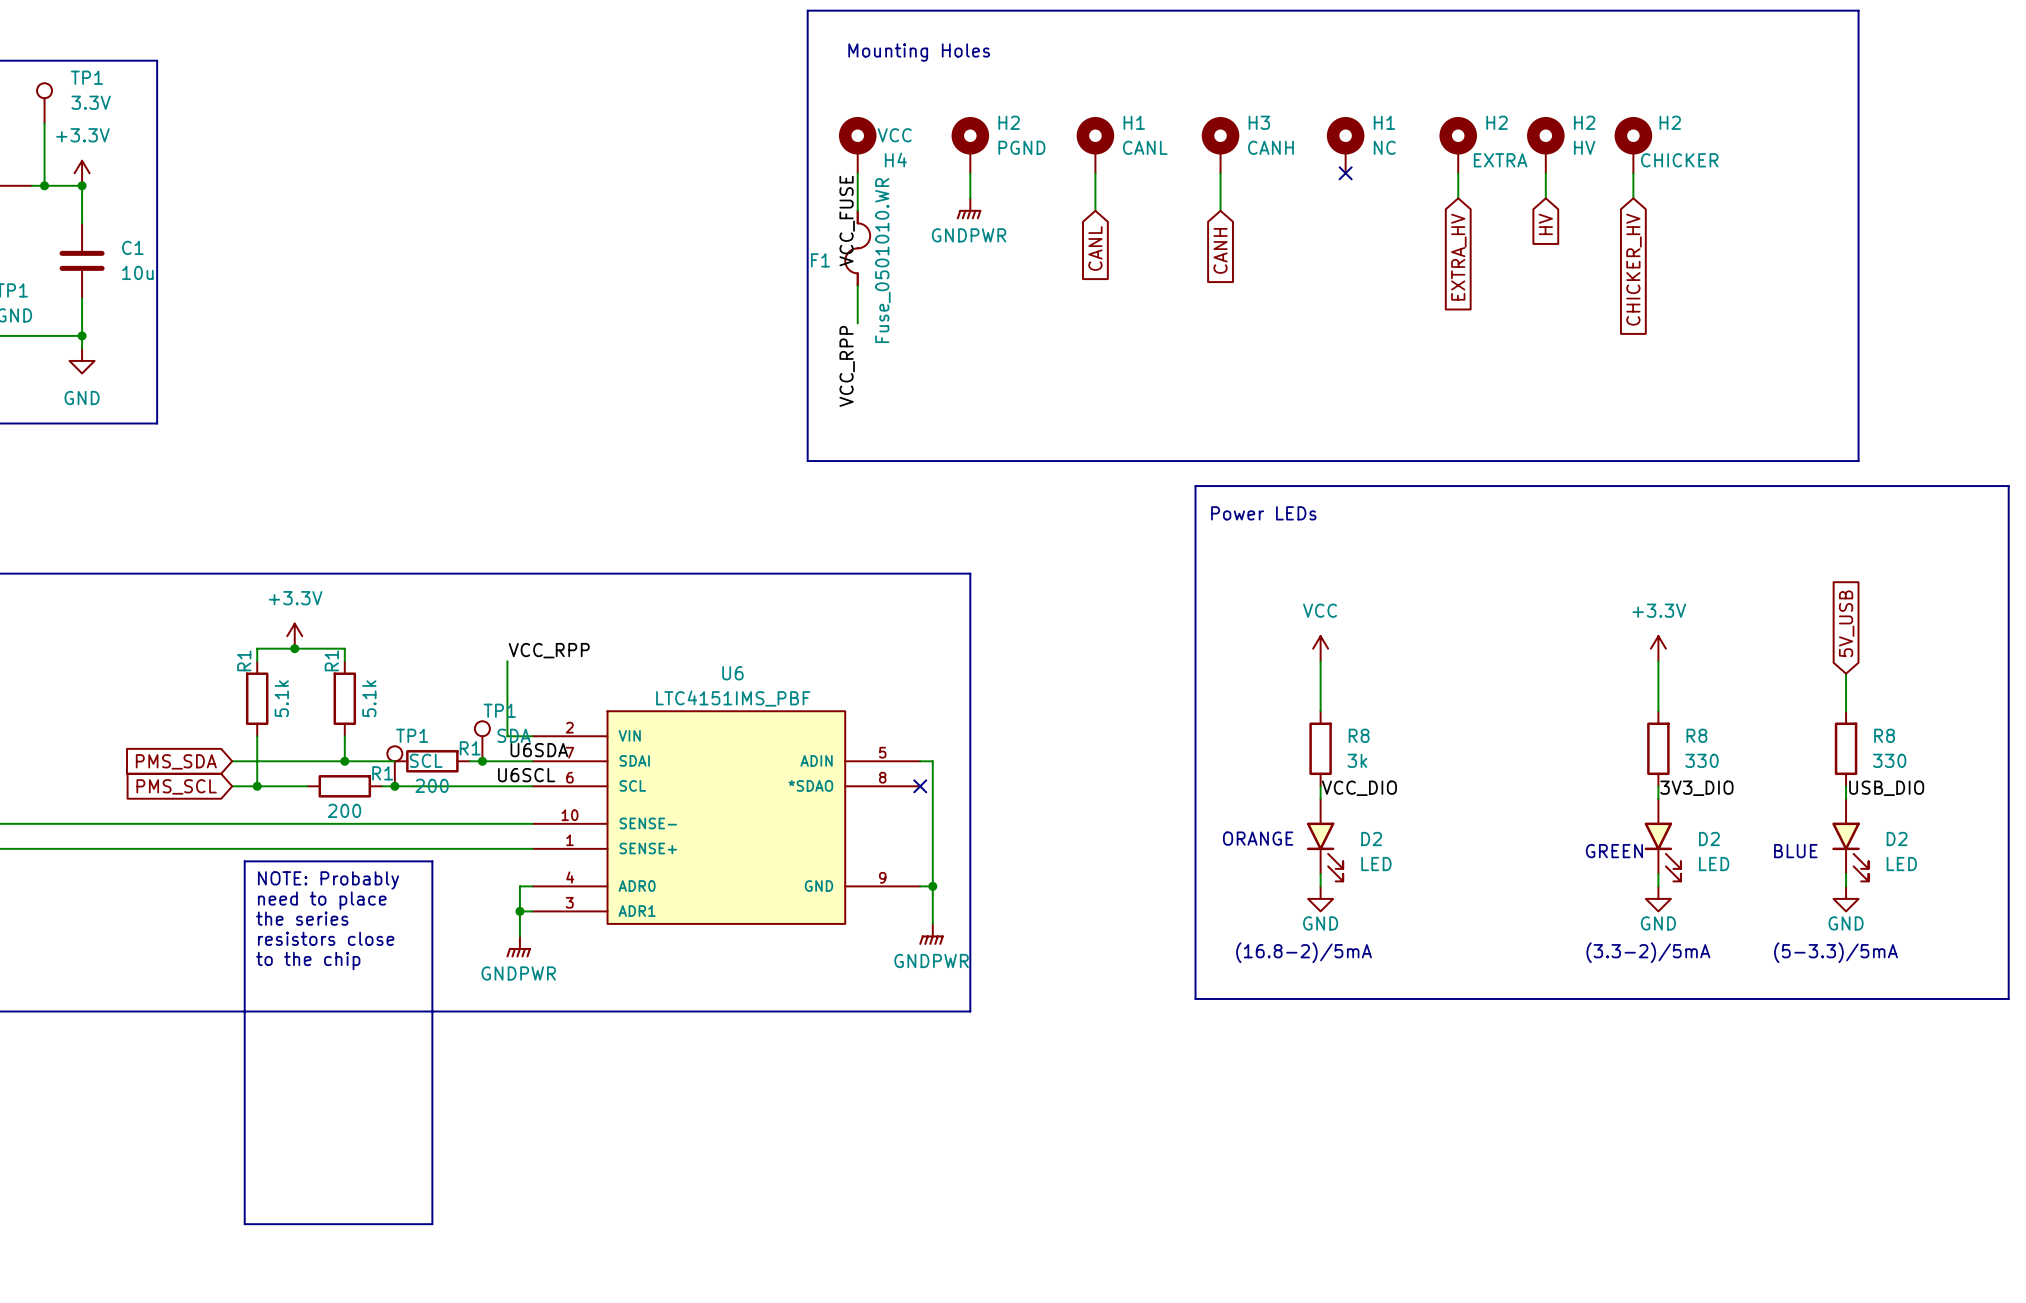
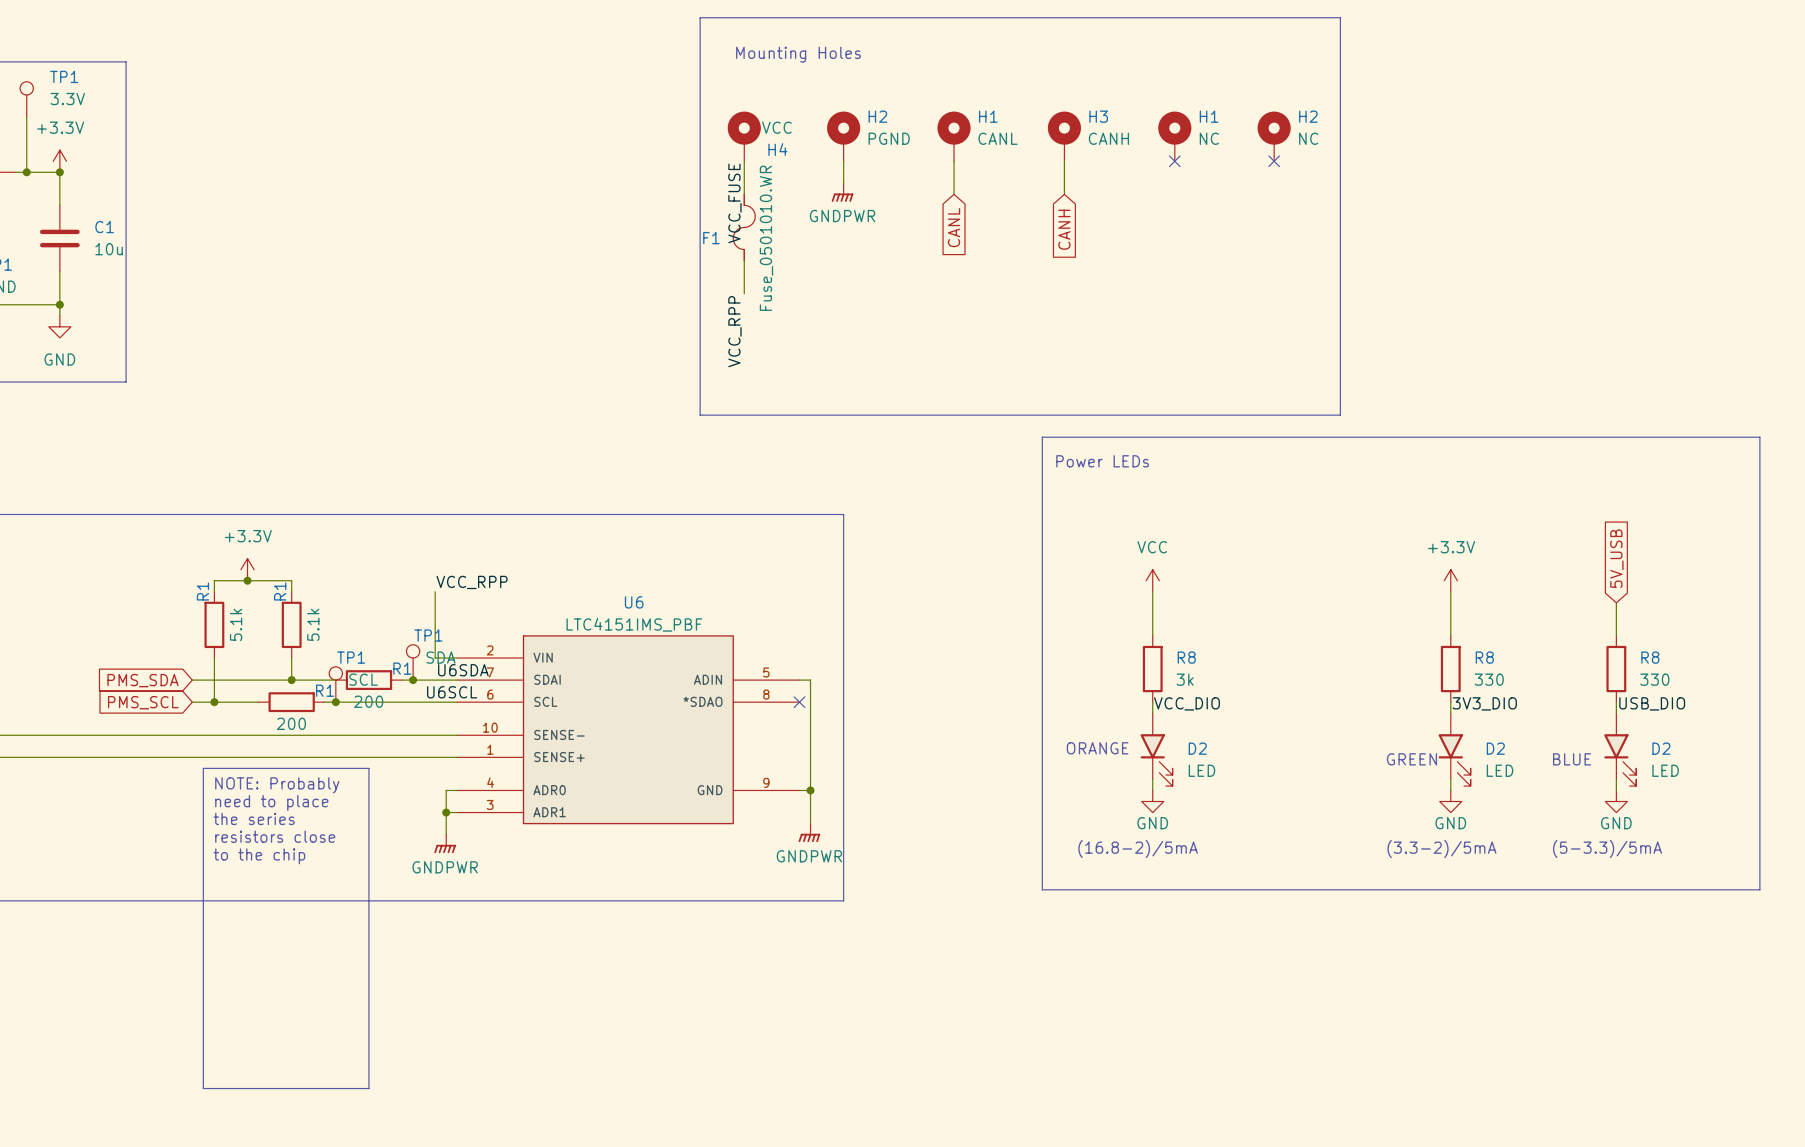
line: (1533, 10) (1858, 10) (1858, 461) (1533, 461) -> (1340, 17) (1340, 415)
H2: HV (1545, 145) -> none
H2: CHICKER (1633, 145) -> none
H2 value: EXTRA (1500, 160) -> NC (1308, 138)
wire: (1458, 173) (1458, 198) -> none
no-connect mark: none -> (1274, 161)
wire: (1545, 173) (1545, 198) -> none
wire: (1633, 173) (1633, 198) -> none
global label: HV (1545, 224) -> none
global label: EXTRA_HV (1458, 257) -> none
global label: CHICKER_HV (1633, 269) -> none

